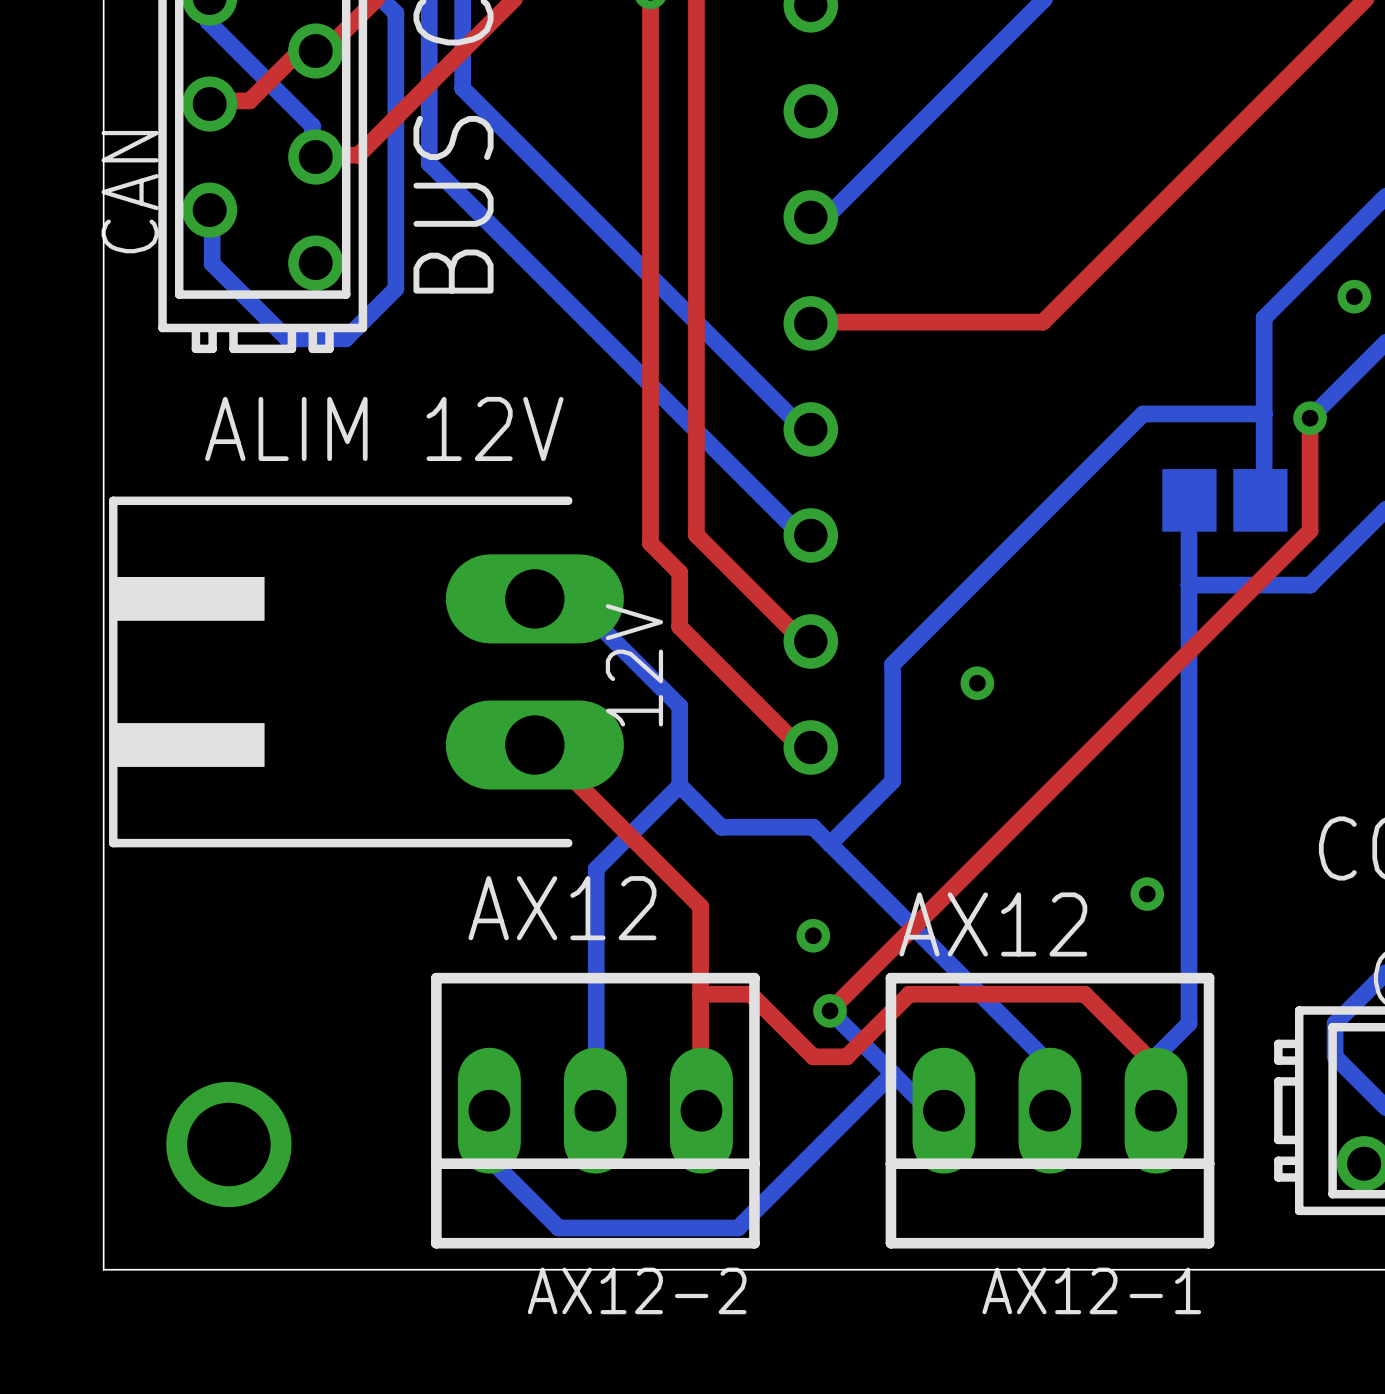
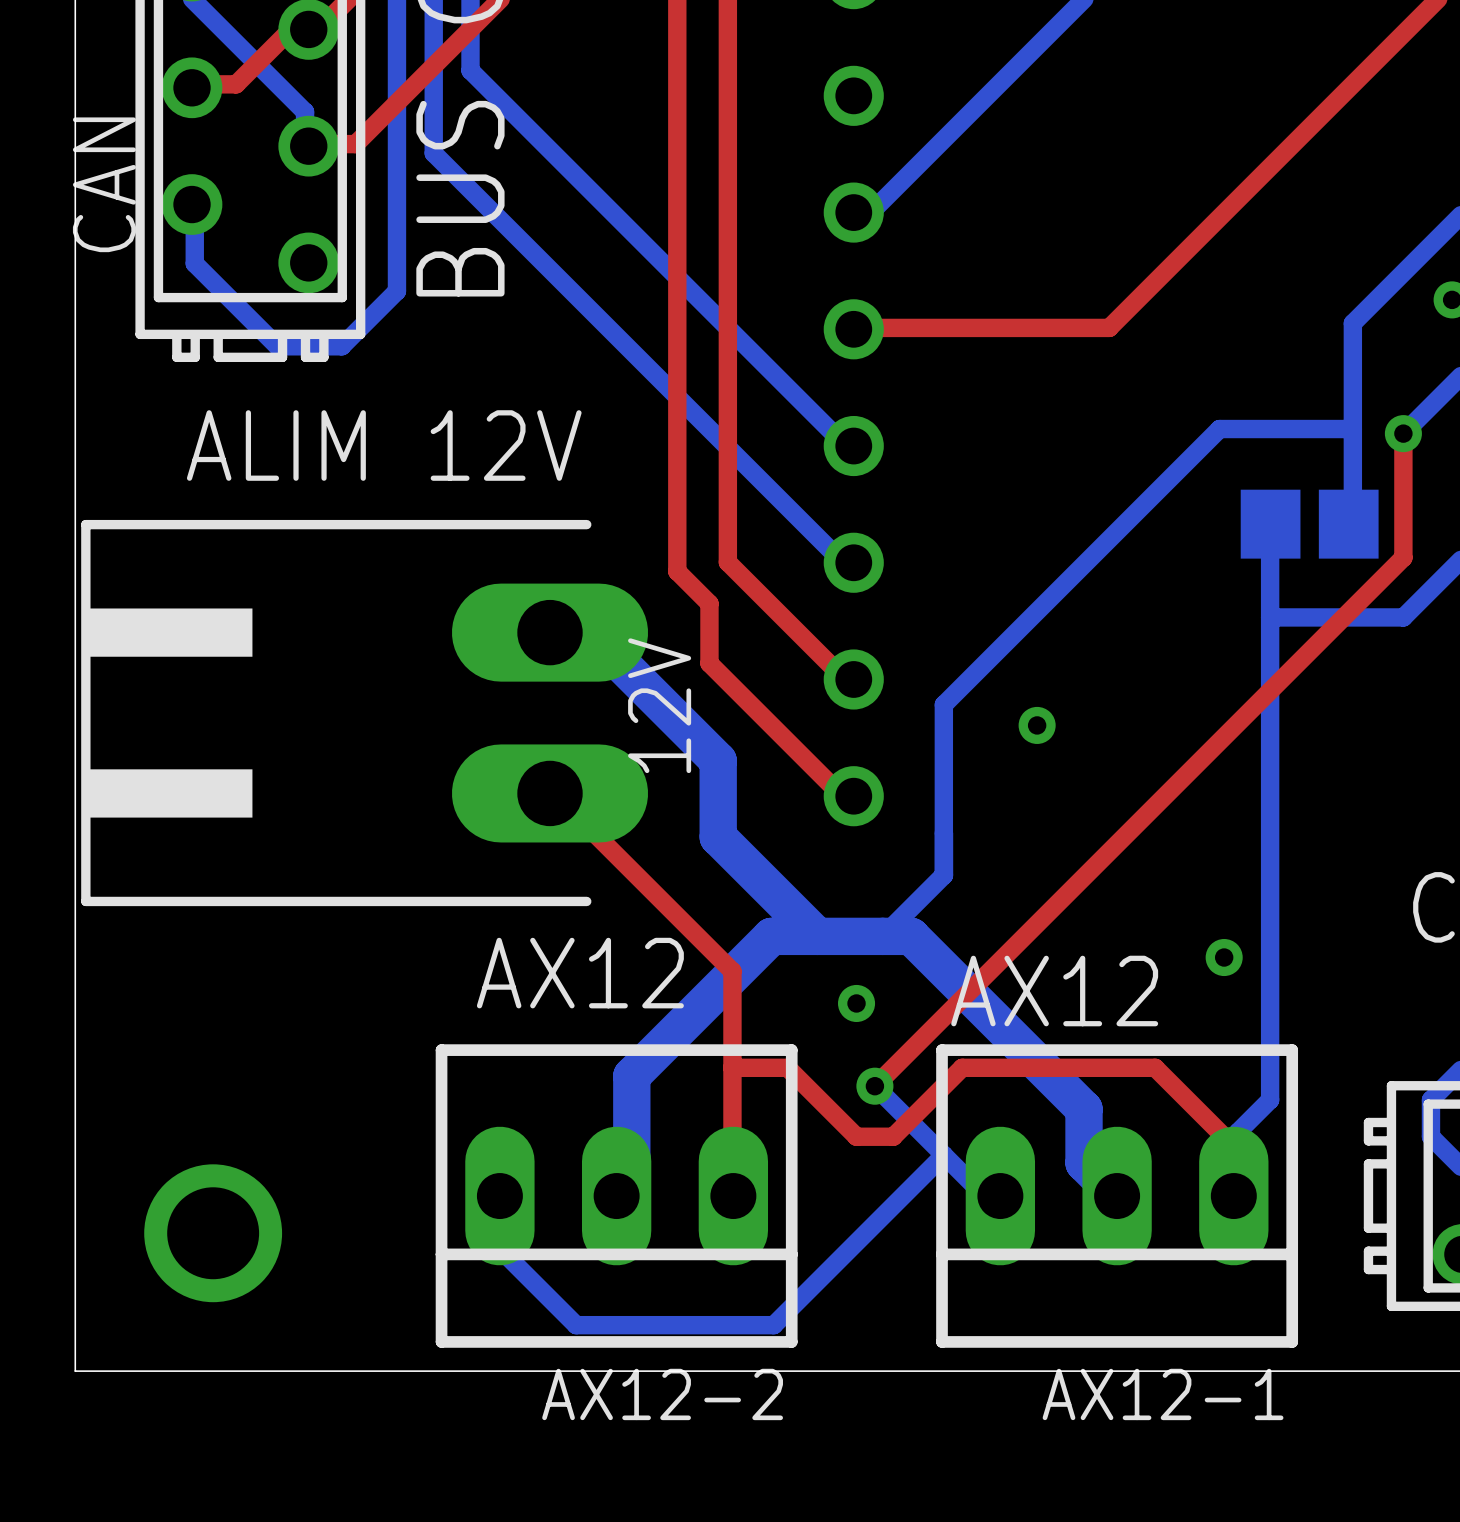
bottom track: (574, 601) (679, 706) (679, 785) -> (593, 635) (718, 760) (718, 837) (817, 936)
bottom track: (892, 781) (830, 843) -> (943, 833) (943, 875) (882, 936)
bottom track: (679, 785) (596, 868) (596, 1106) -> none
bottom track: (679, 785) (721, 827) (813, 827) (1047, 1061) -> none
bottom track: none -> (616, 1196) (631, 1180) (631, 1076) (771, 936) (911, 936) (1084, 1109) (1084, 1162) (1117, 1196)

